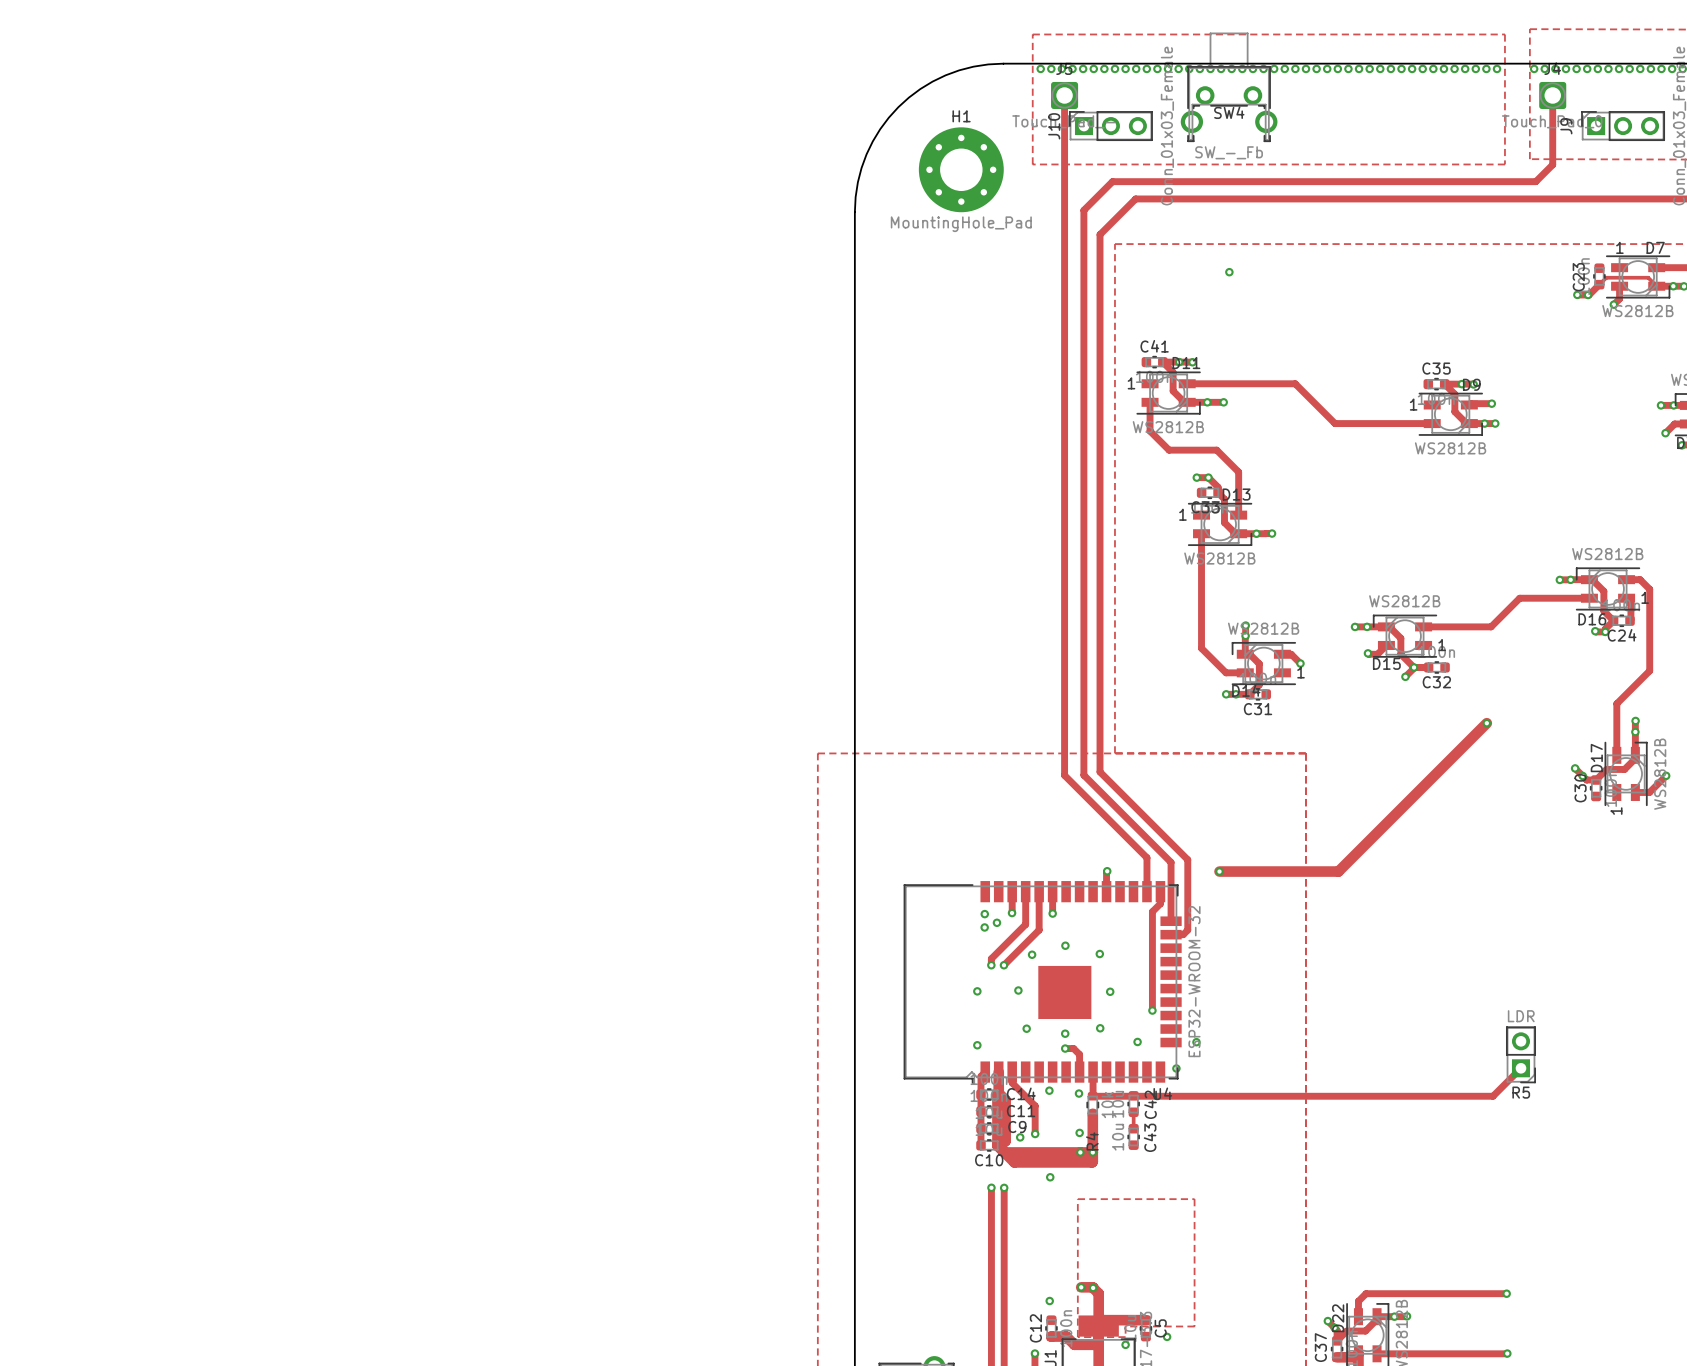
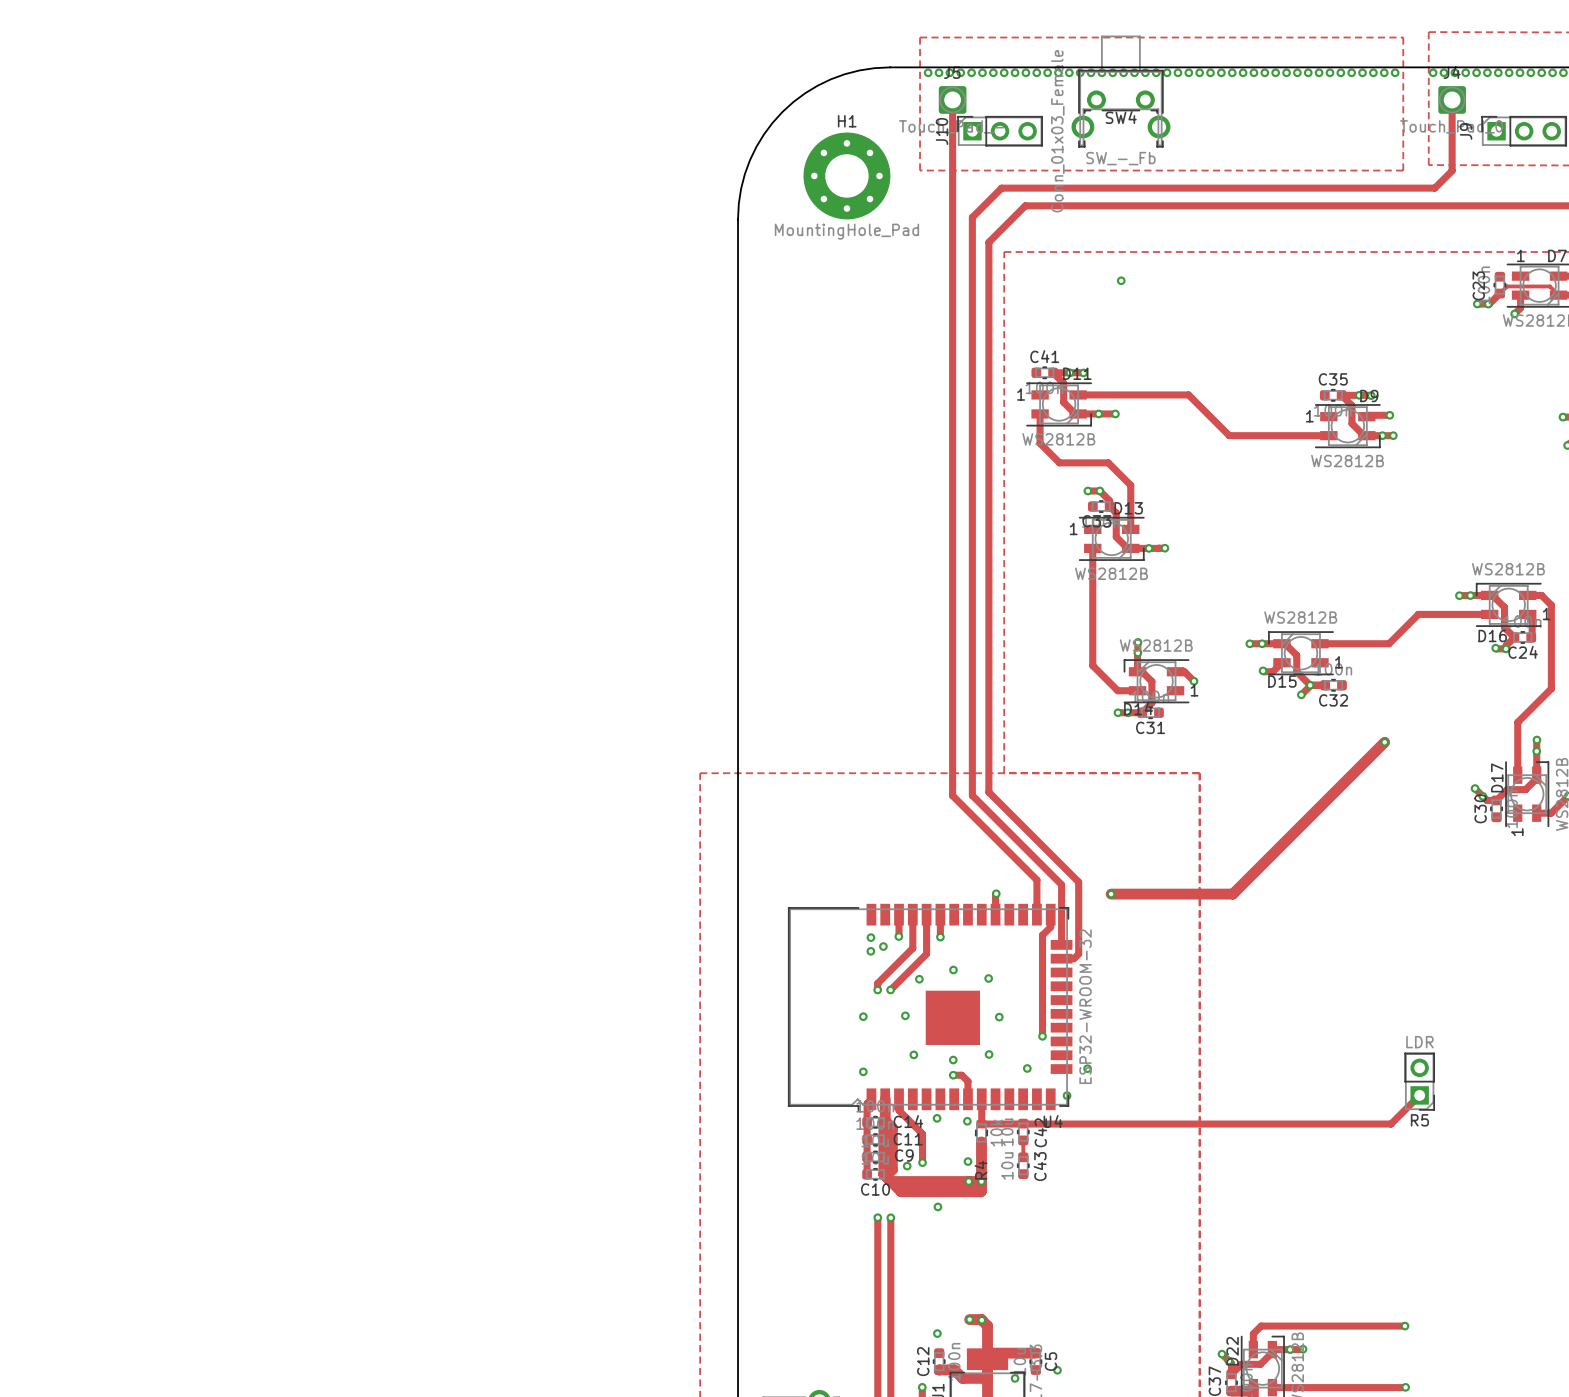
zone outline: (1077, 1199) (1077, 1337) (1125, 1337) (1125, 1326) (1194, 1326) (1194, 1199) (1077, 1199) -> none

